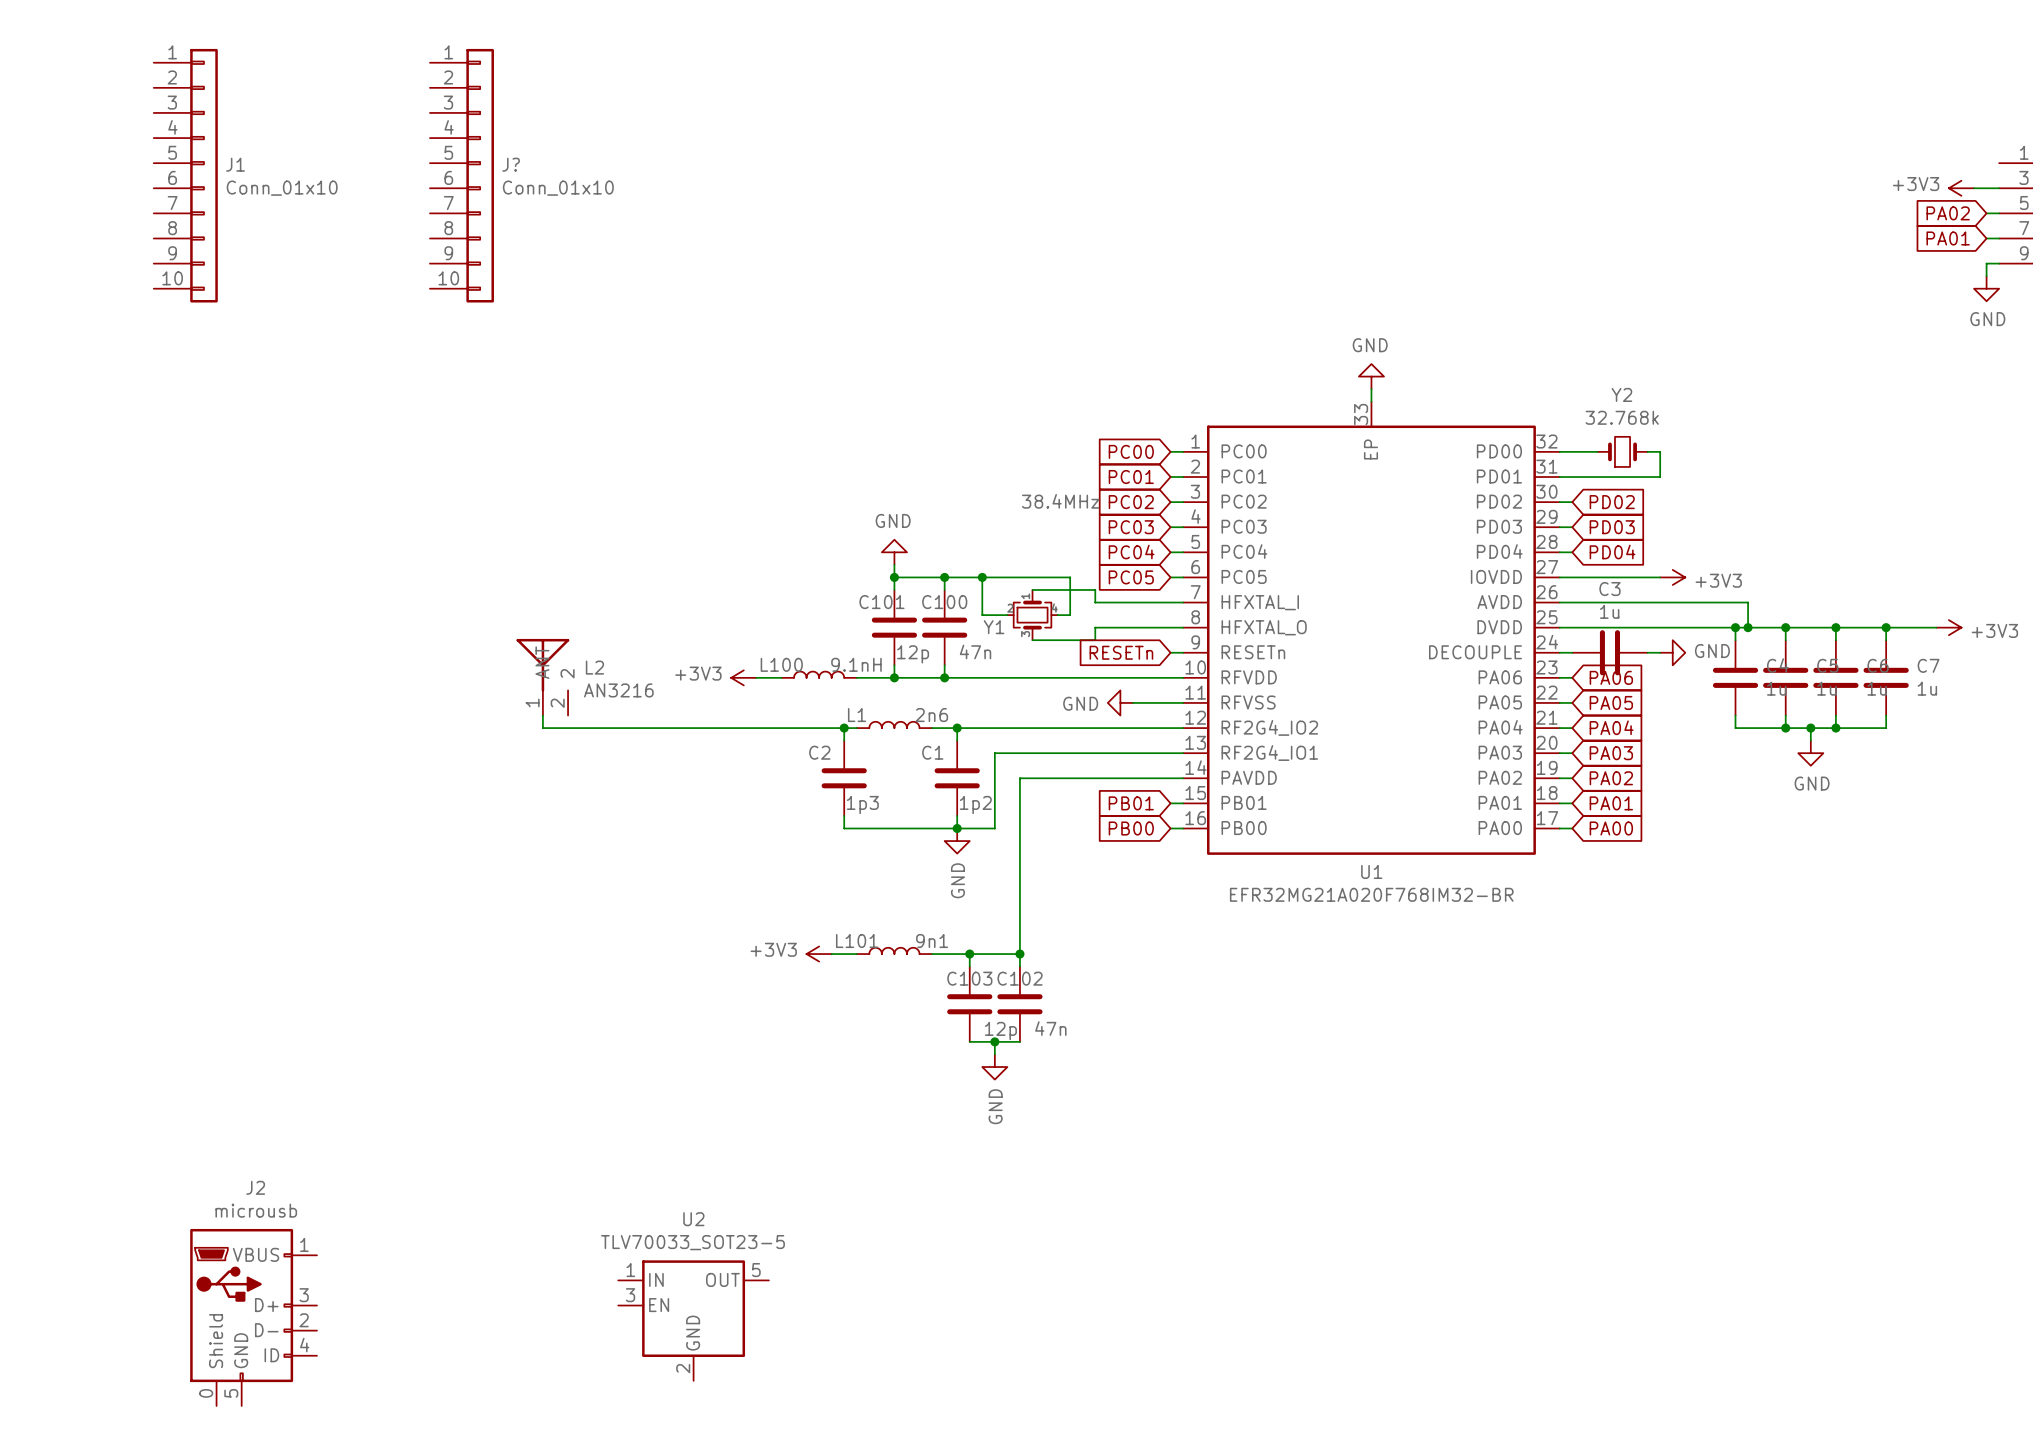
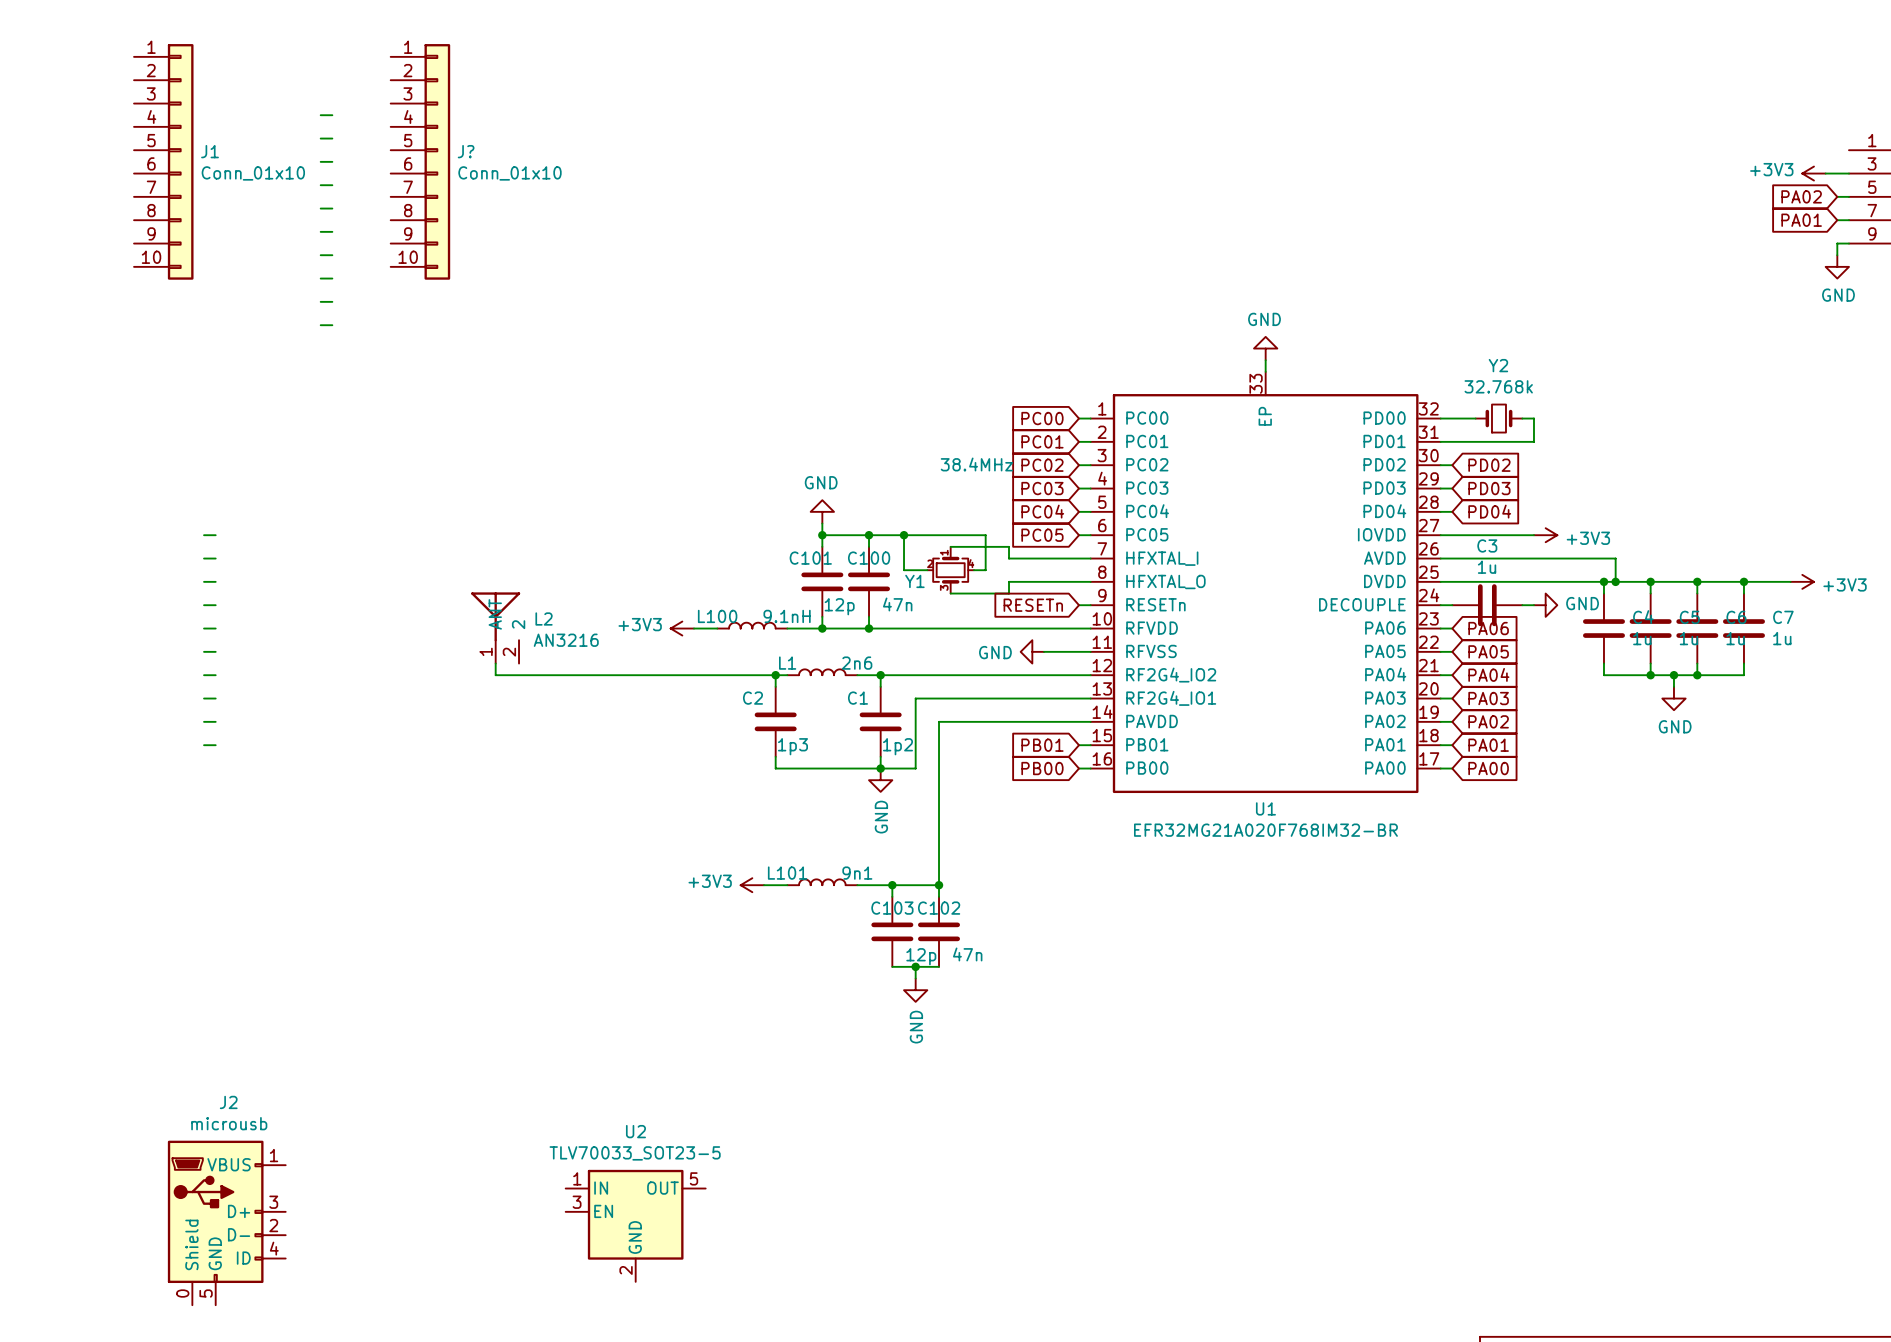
wire: none -> (320, 115) (332, 115)
wire: none -> (320, 138) (332, 138)
wire: none -> (320, 161) (332, 161)
wire: none -> (320, 185) (332, 185)
wire: none -> (320, 208) (332, 208)
wire: none -> (320, 231) (332, 231)
wire: none -> (320, 255) (332, 255)
wire: none -> (320, 278) (332, 278)
wire: none -> (320, 301) (332, 301)
wire: none -> (320, 325) (332, 325)
wire: none -> (204, 535) (215, 535)
wire: none -> (204, 558) (215, 558)
wire: none -> (204, 581) (215, 581)
wire: none -> (204, 605) (215, 605)
wire: none -> (204, 628) (215, 628)
wire: none -> (204, 651) (215, 651)
wire: none -> (204, 675) (215, 675)
wire: none -> (204, 698) (215, 698)
wire: none -> (204, 721) (215, 721)
wire: none -> (204, 745) (215, 745)

